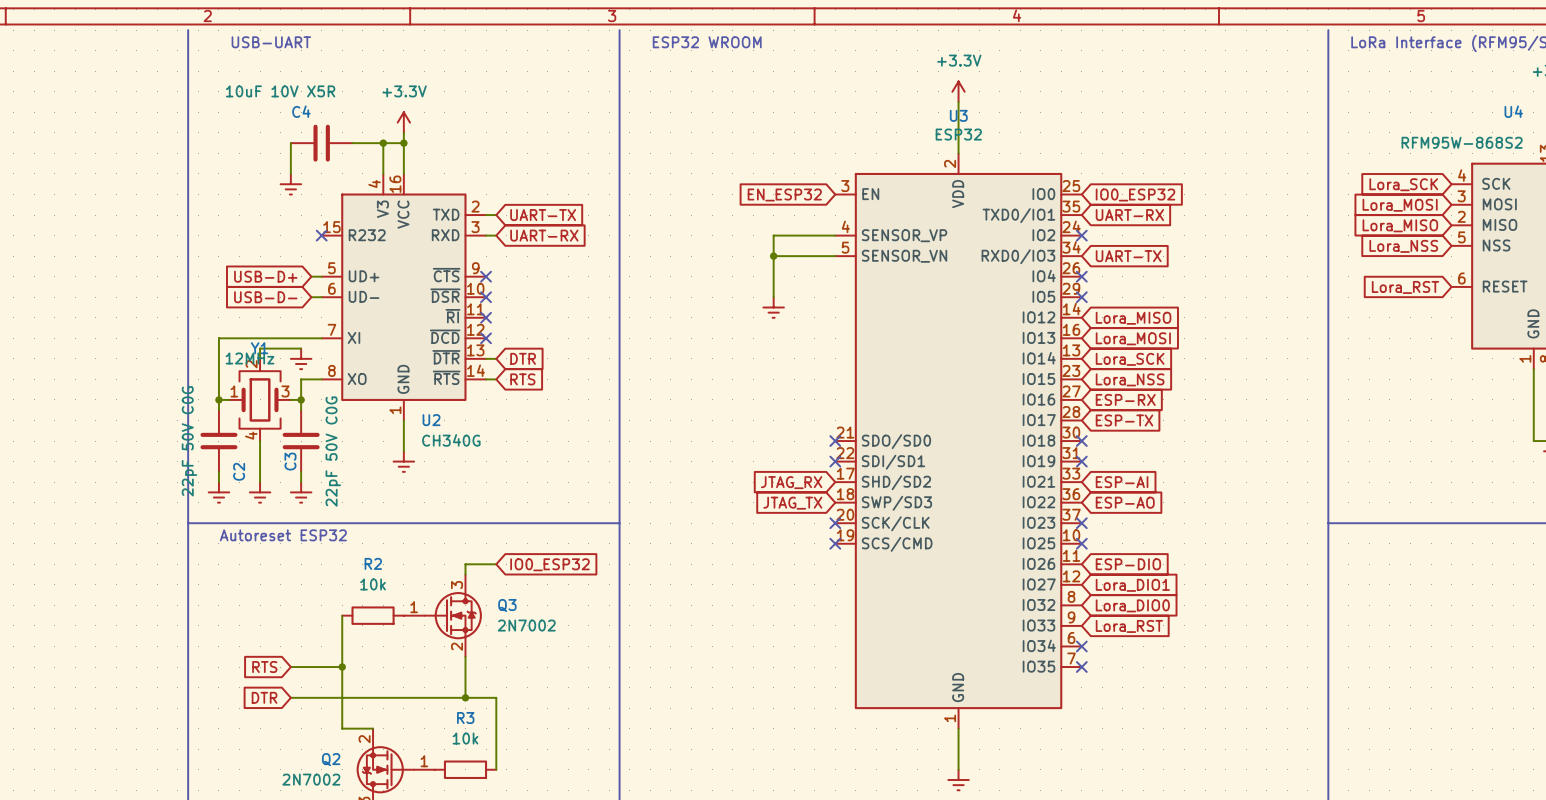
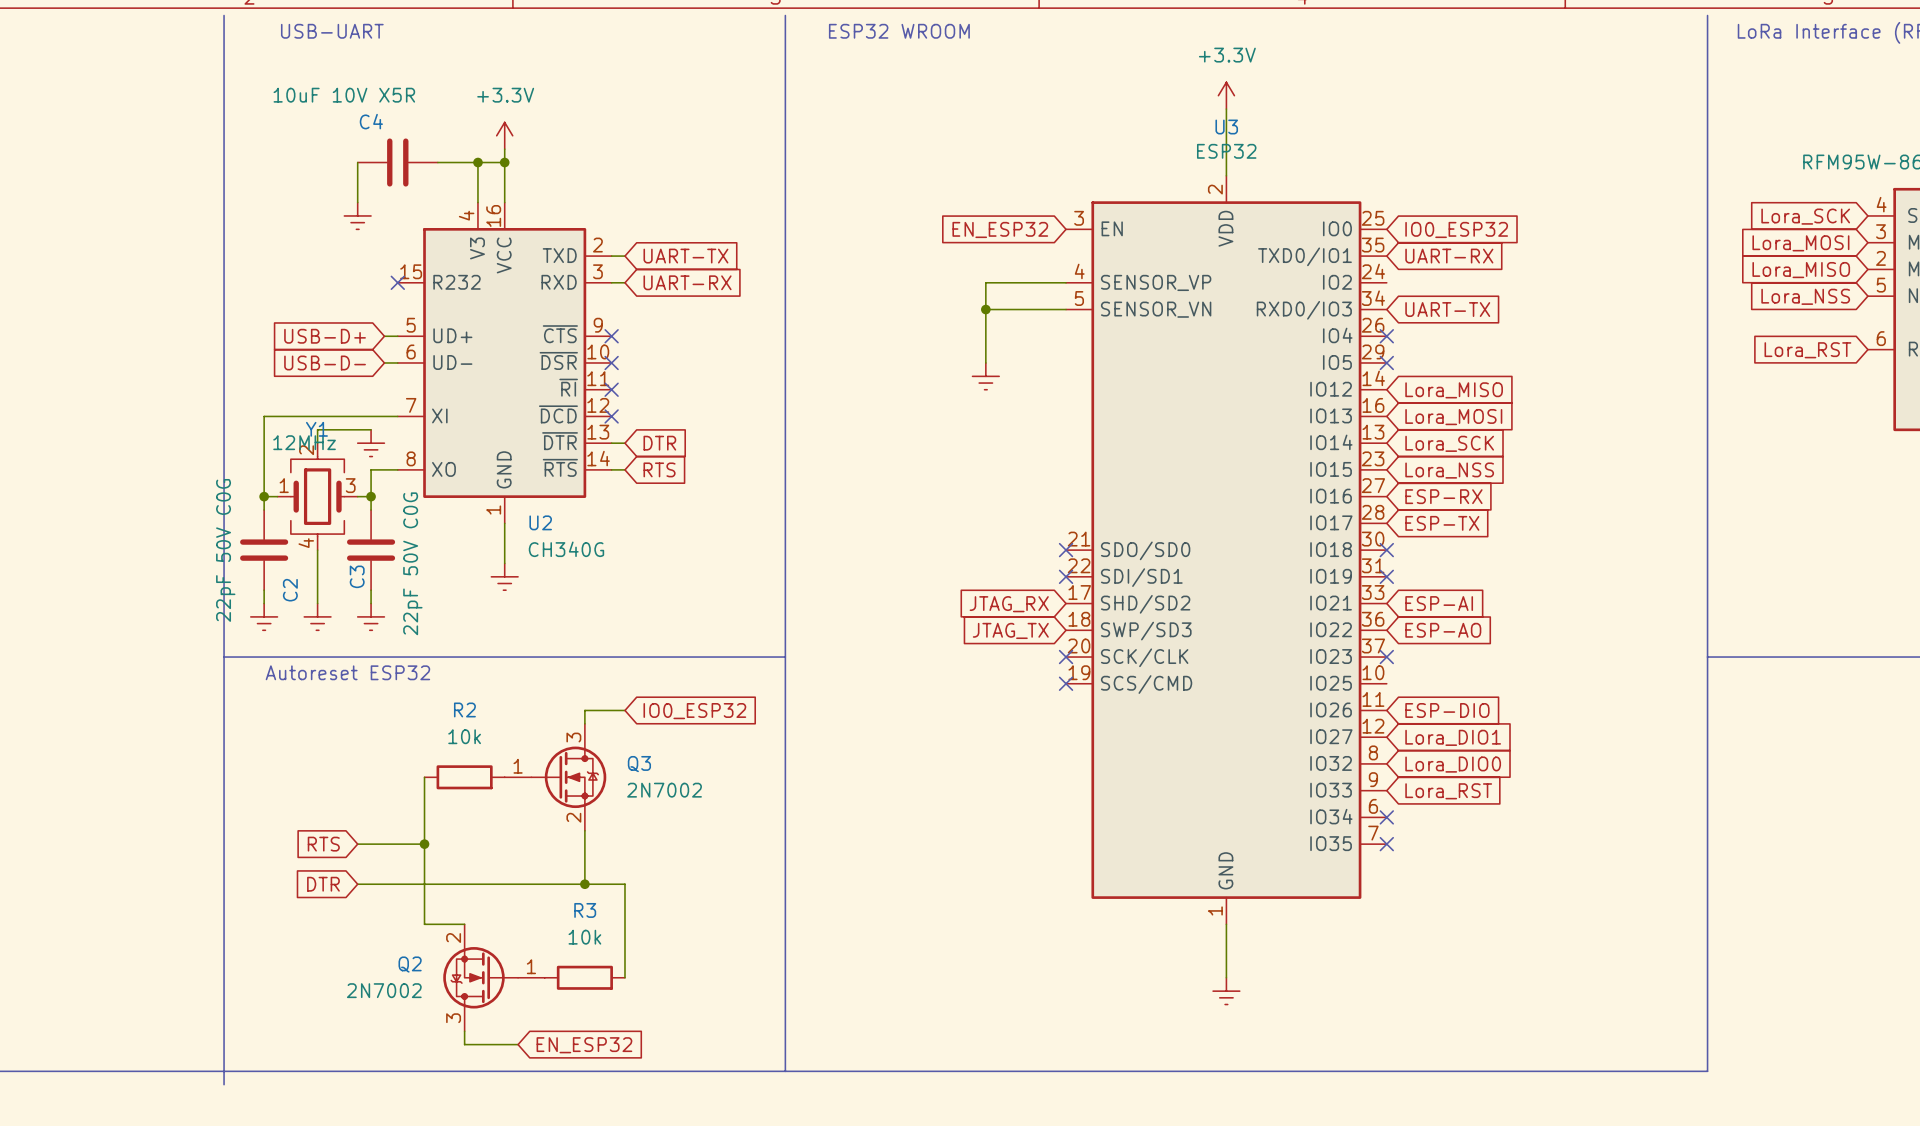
no-connect mark: (1081, 235) -> none
no-connect mark: (1081, 543) -> none

